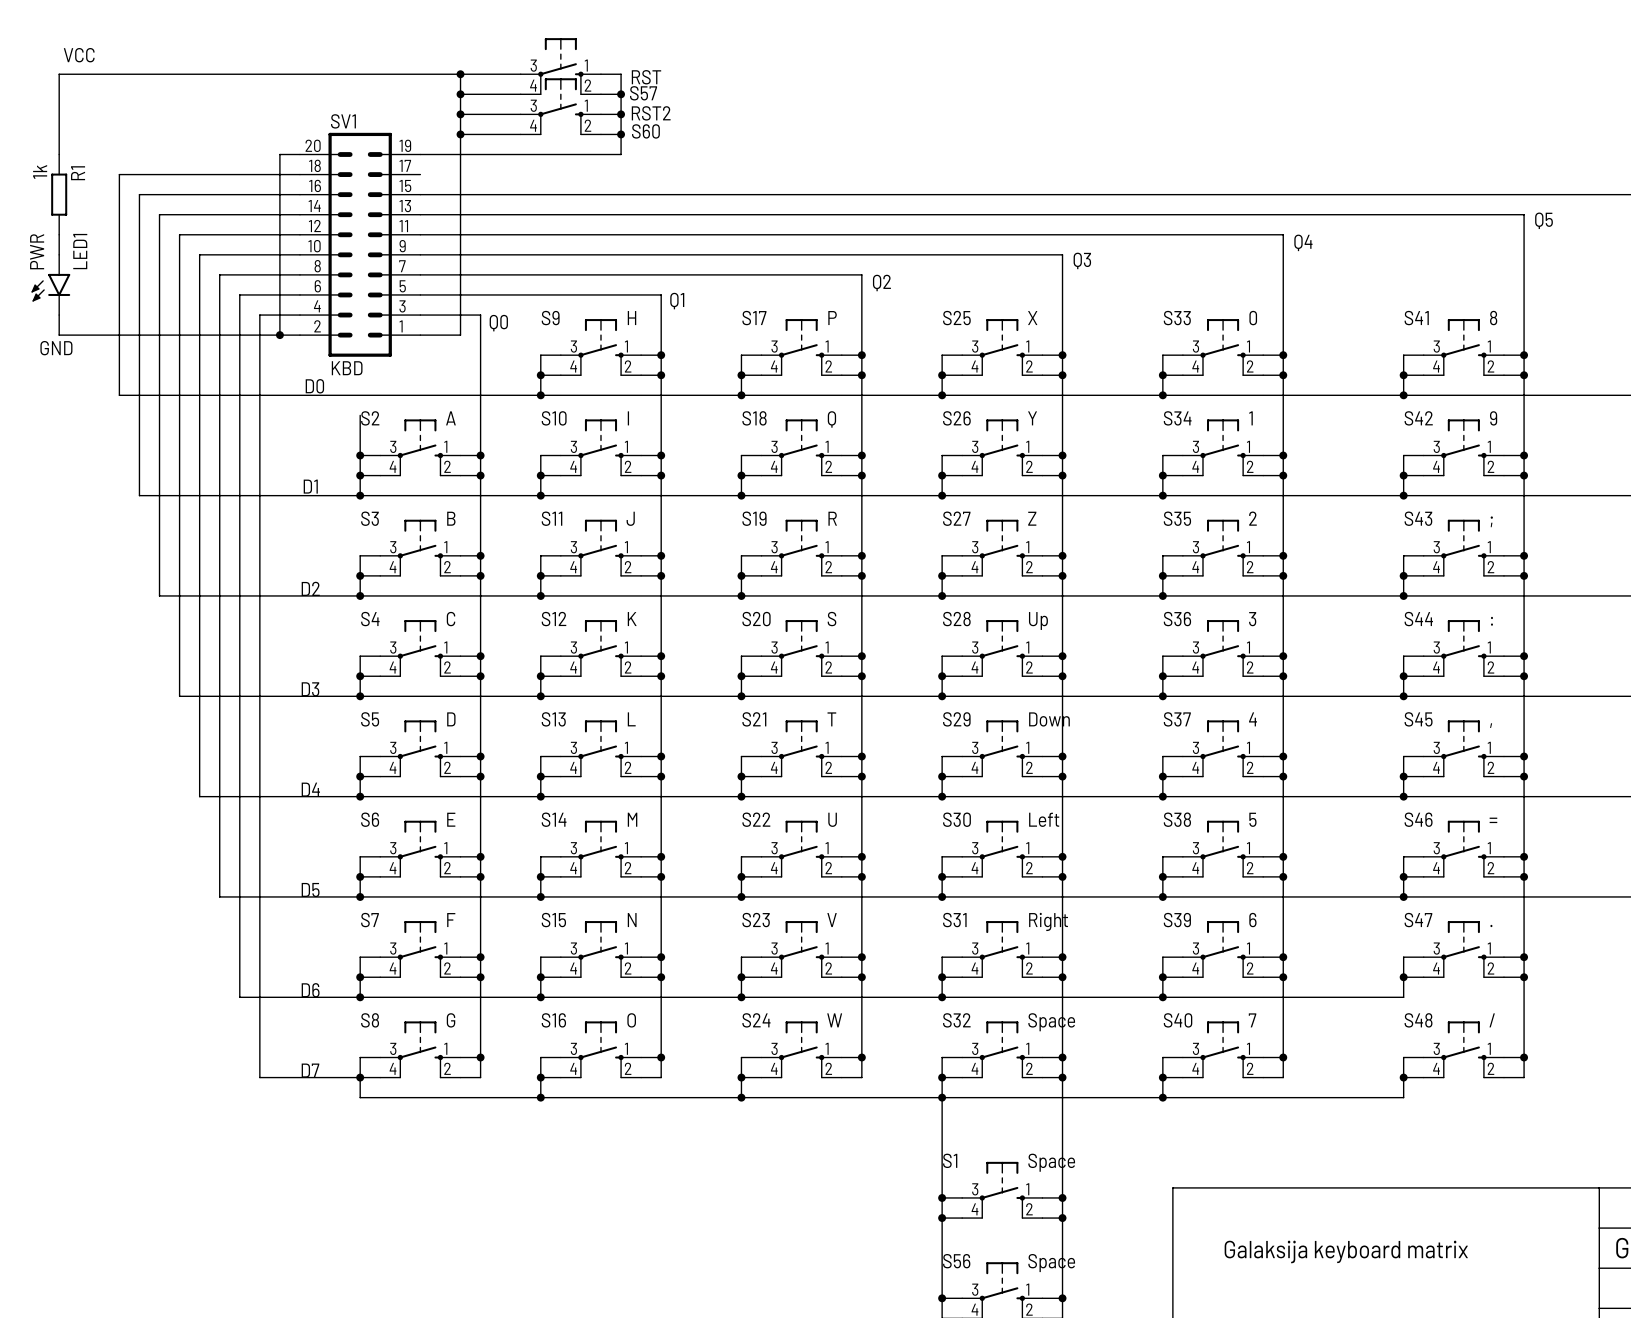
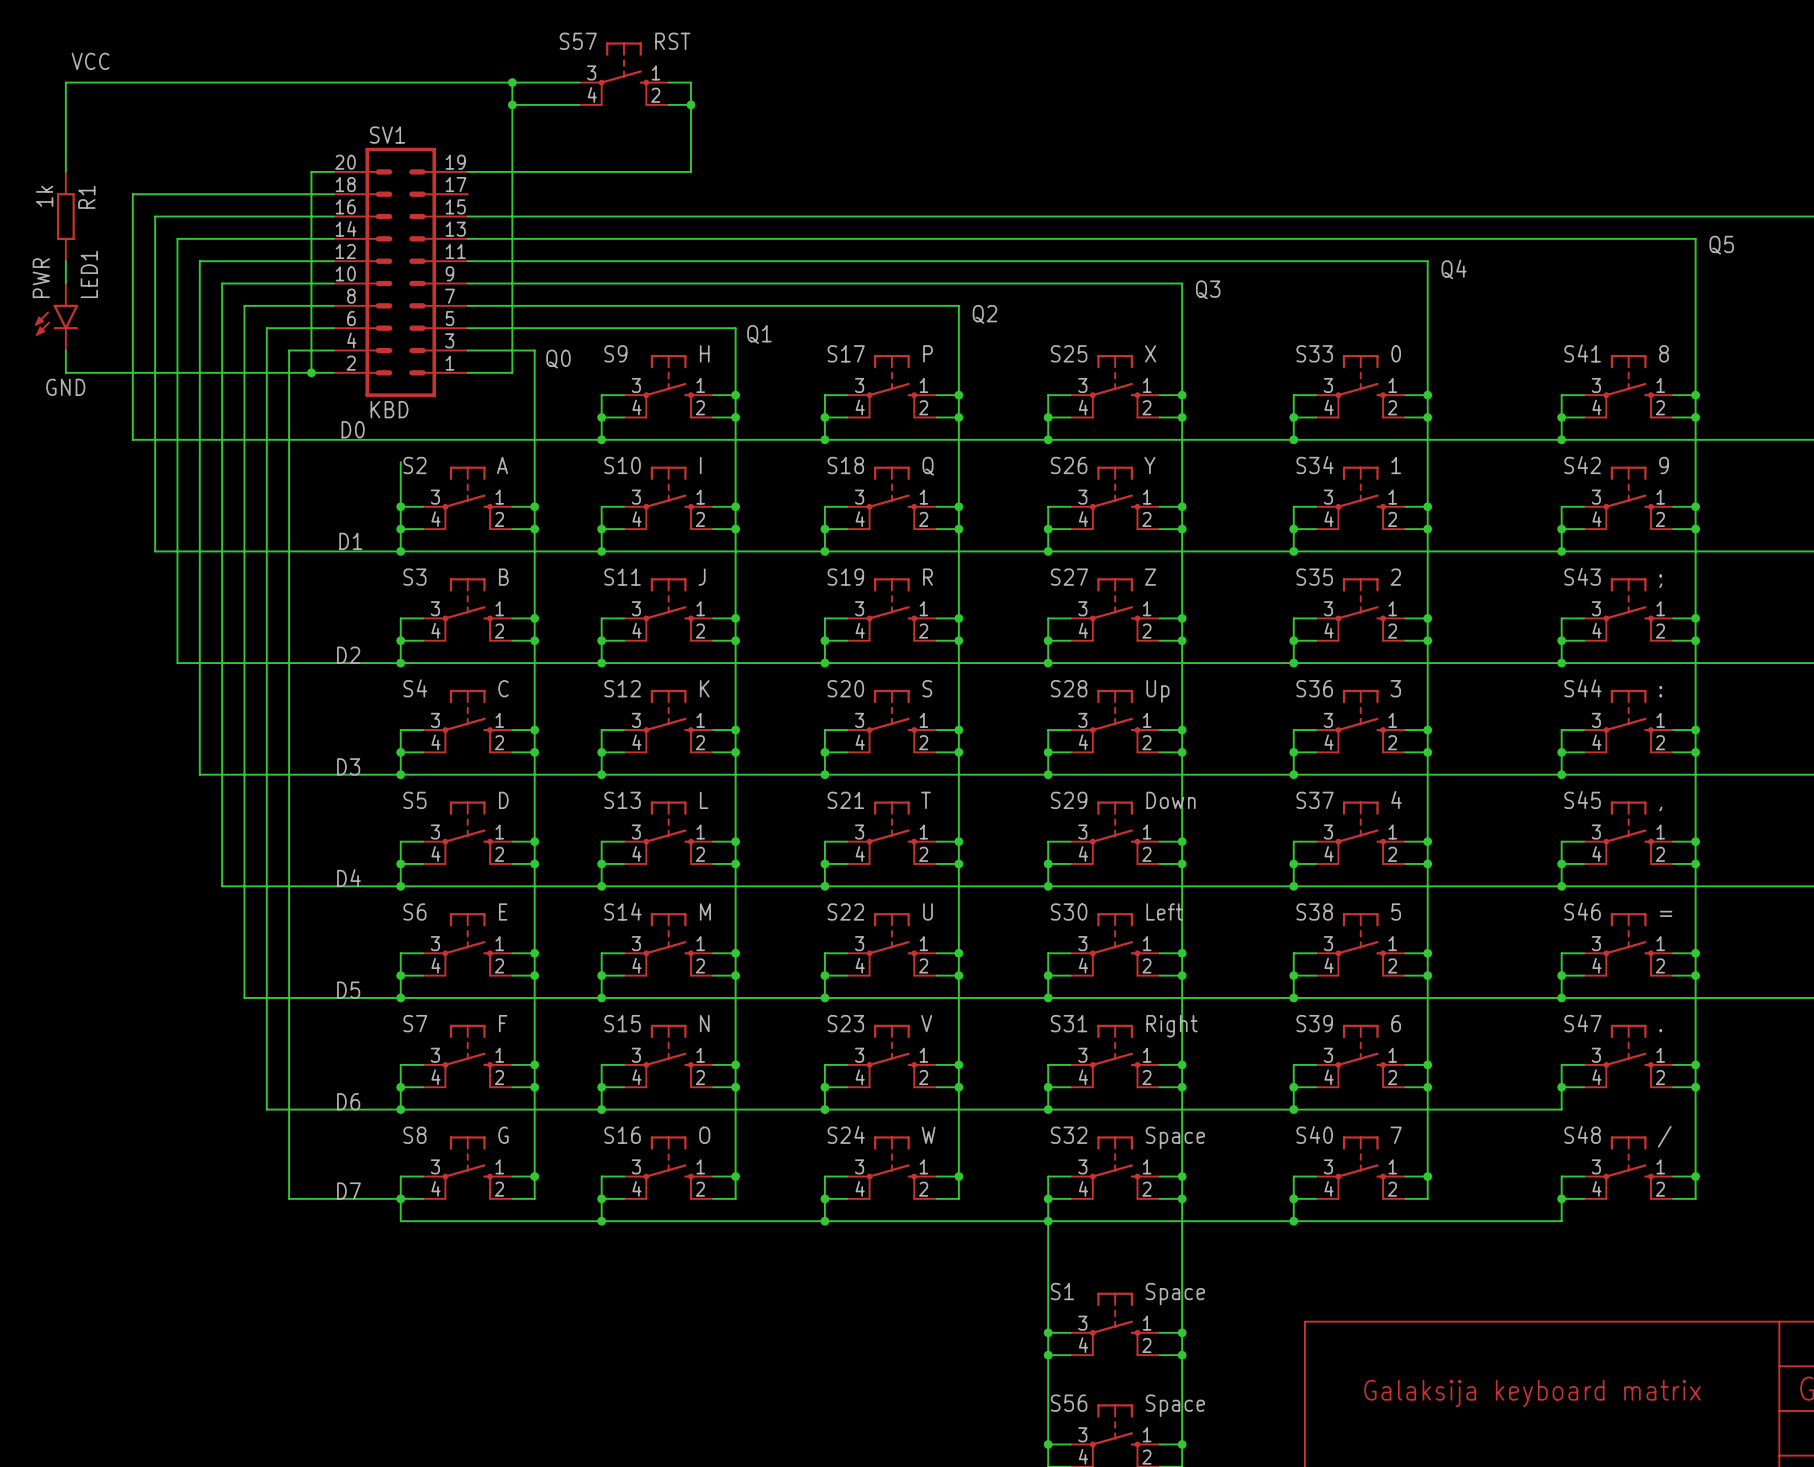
S57 value position: RST (646, 77) -> RST (672, 41)
S57 name position: S57 (643, 93) -> S57 (578, 41)
S60: RST2 (560, 106) -> none
wire: (460, 114) (520, 114) -> none
junction: (460, 114) -> none
wire: (600, 114) (621, 114) -> none
junction: (621, 114) -> none
wire: (460, 134) (520, 134) -> none
junction: (460, 134) -> none
wire: (600, 134) (621, 134) -> none
junction: (621, 134) -> none

